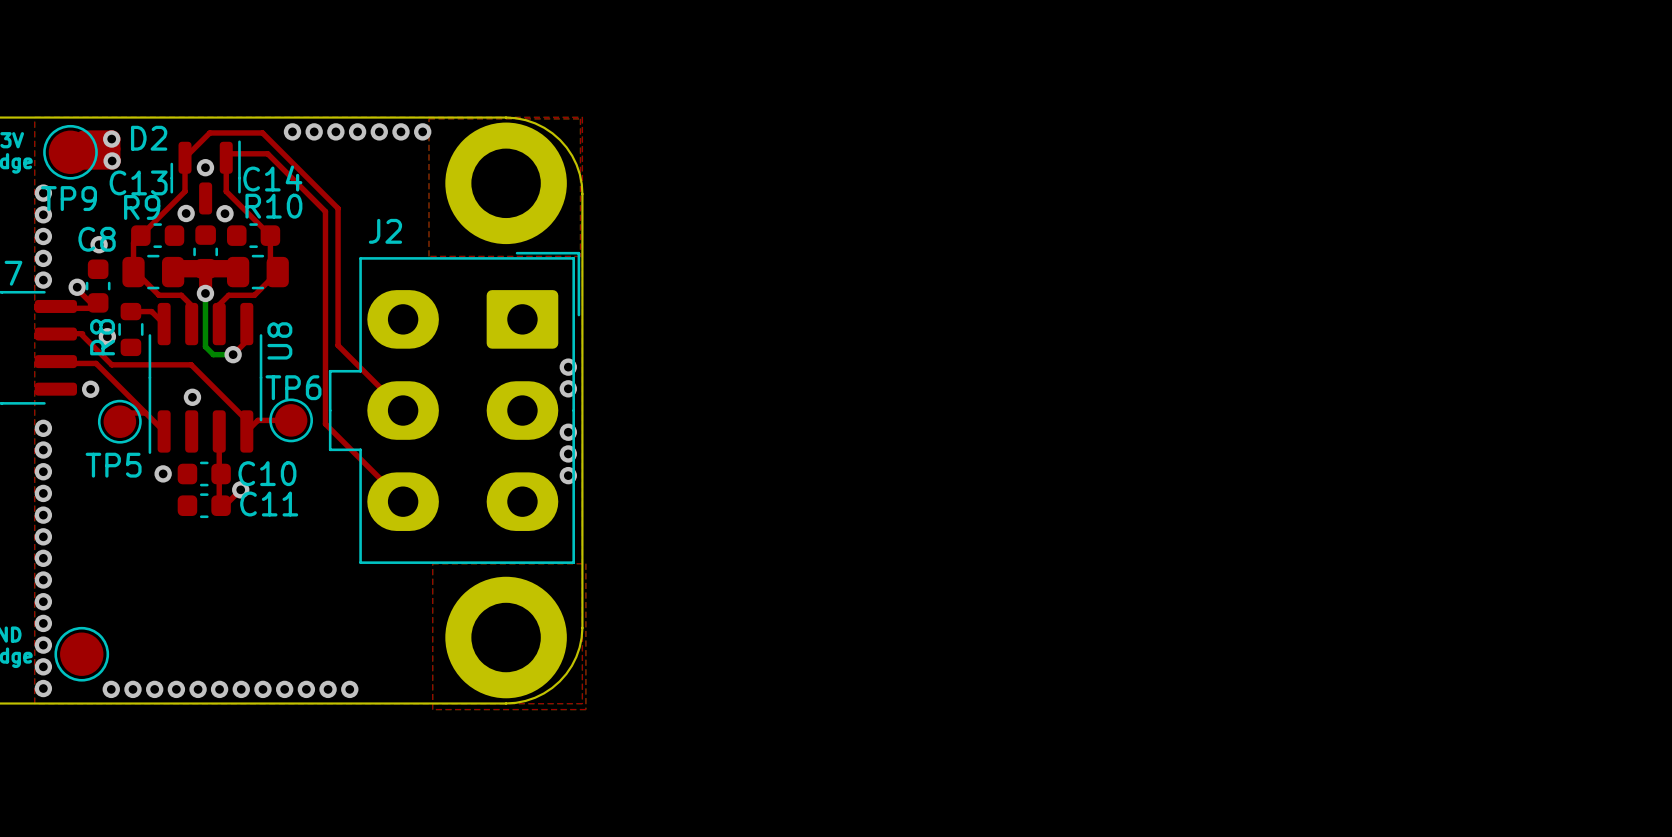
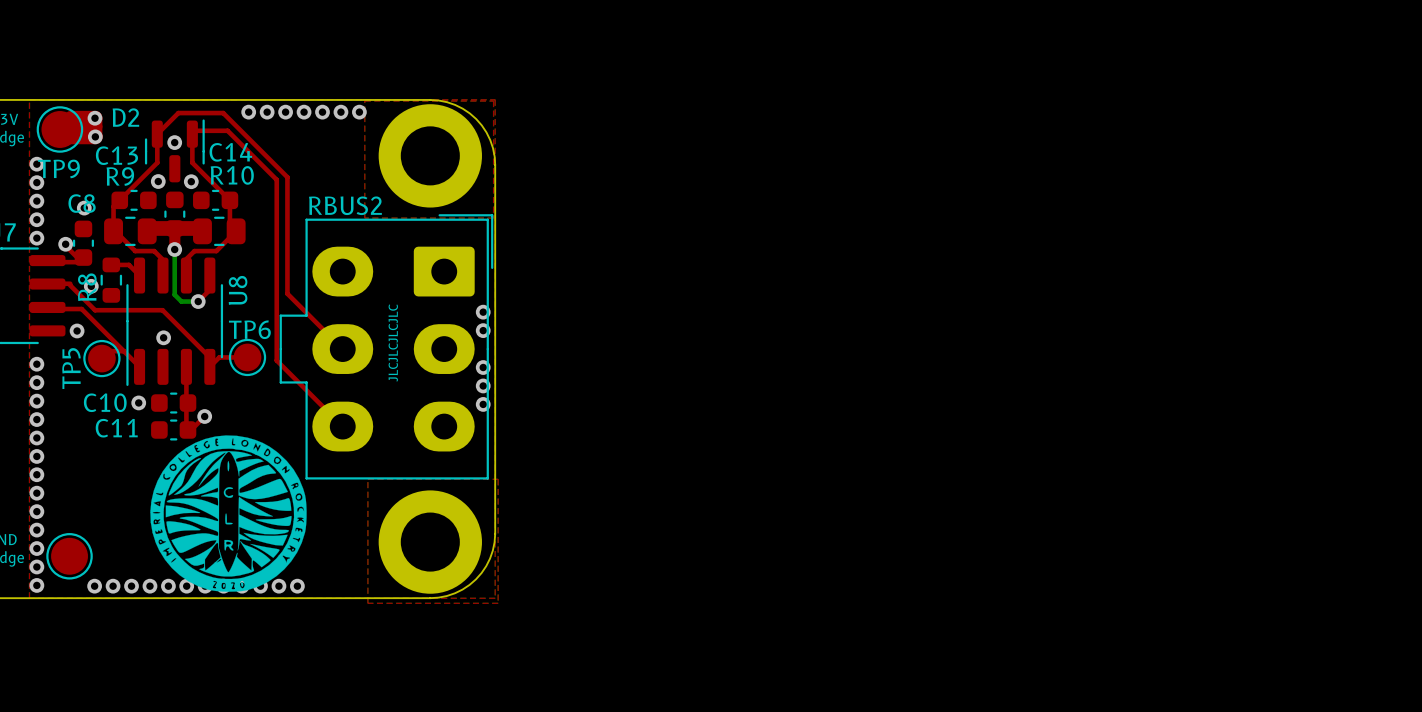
J2 name: J2 (385, 231) -> RBUS2 (345, 205)
text: none -> JLCJLCJLCJLC (393, 343)
TP5 name rotation: 0° (113, 465) -> 90° counterclockwise (71, 368)
C10 name position: C10 (267, 473) -> C10 (105, 402)
C11 name position: C11 (269, 504) -> C11 (116, 428)
drawing: none -> [150, 435, 307, 592]

